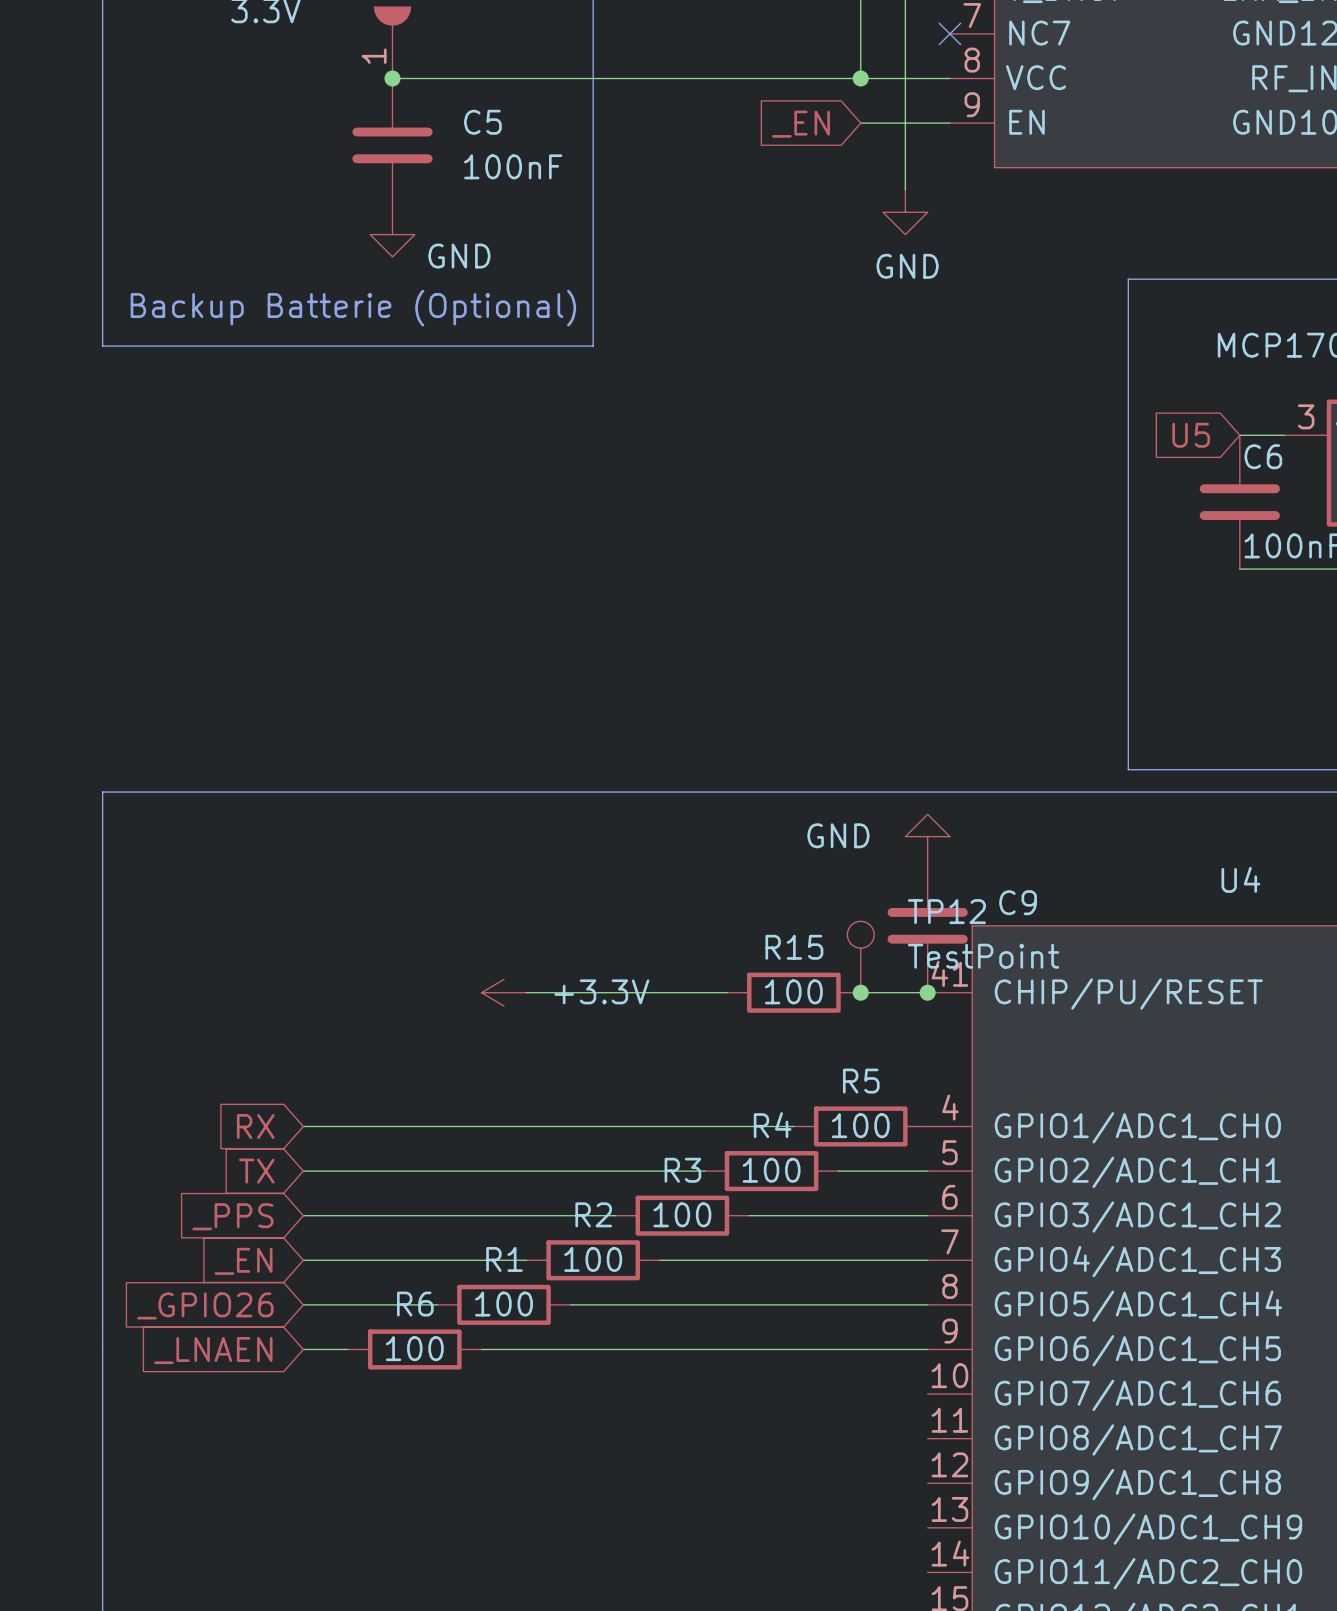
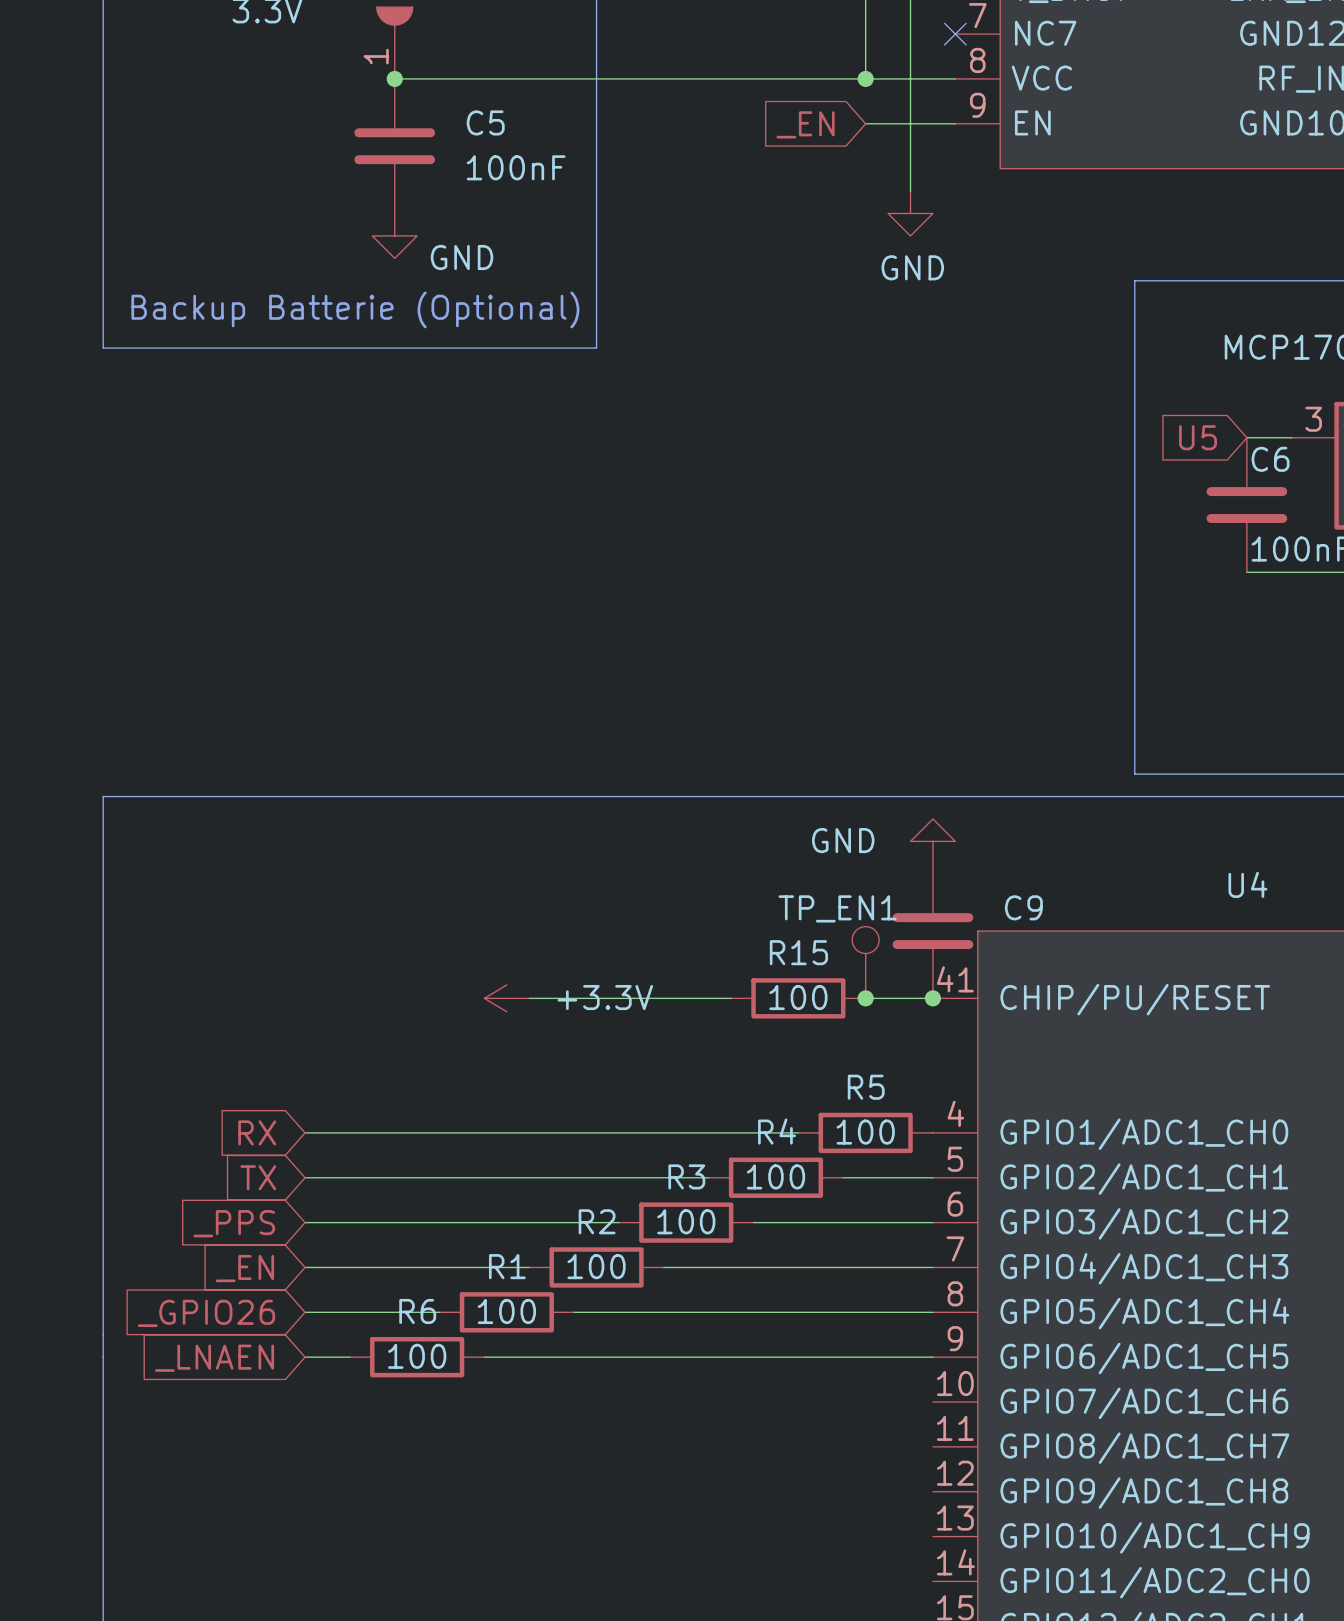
TP12 name: TP12 (946, 911) -> TP_EN1 (837, 908)
TP12 value: TestPoint (983, 956) -> none

